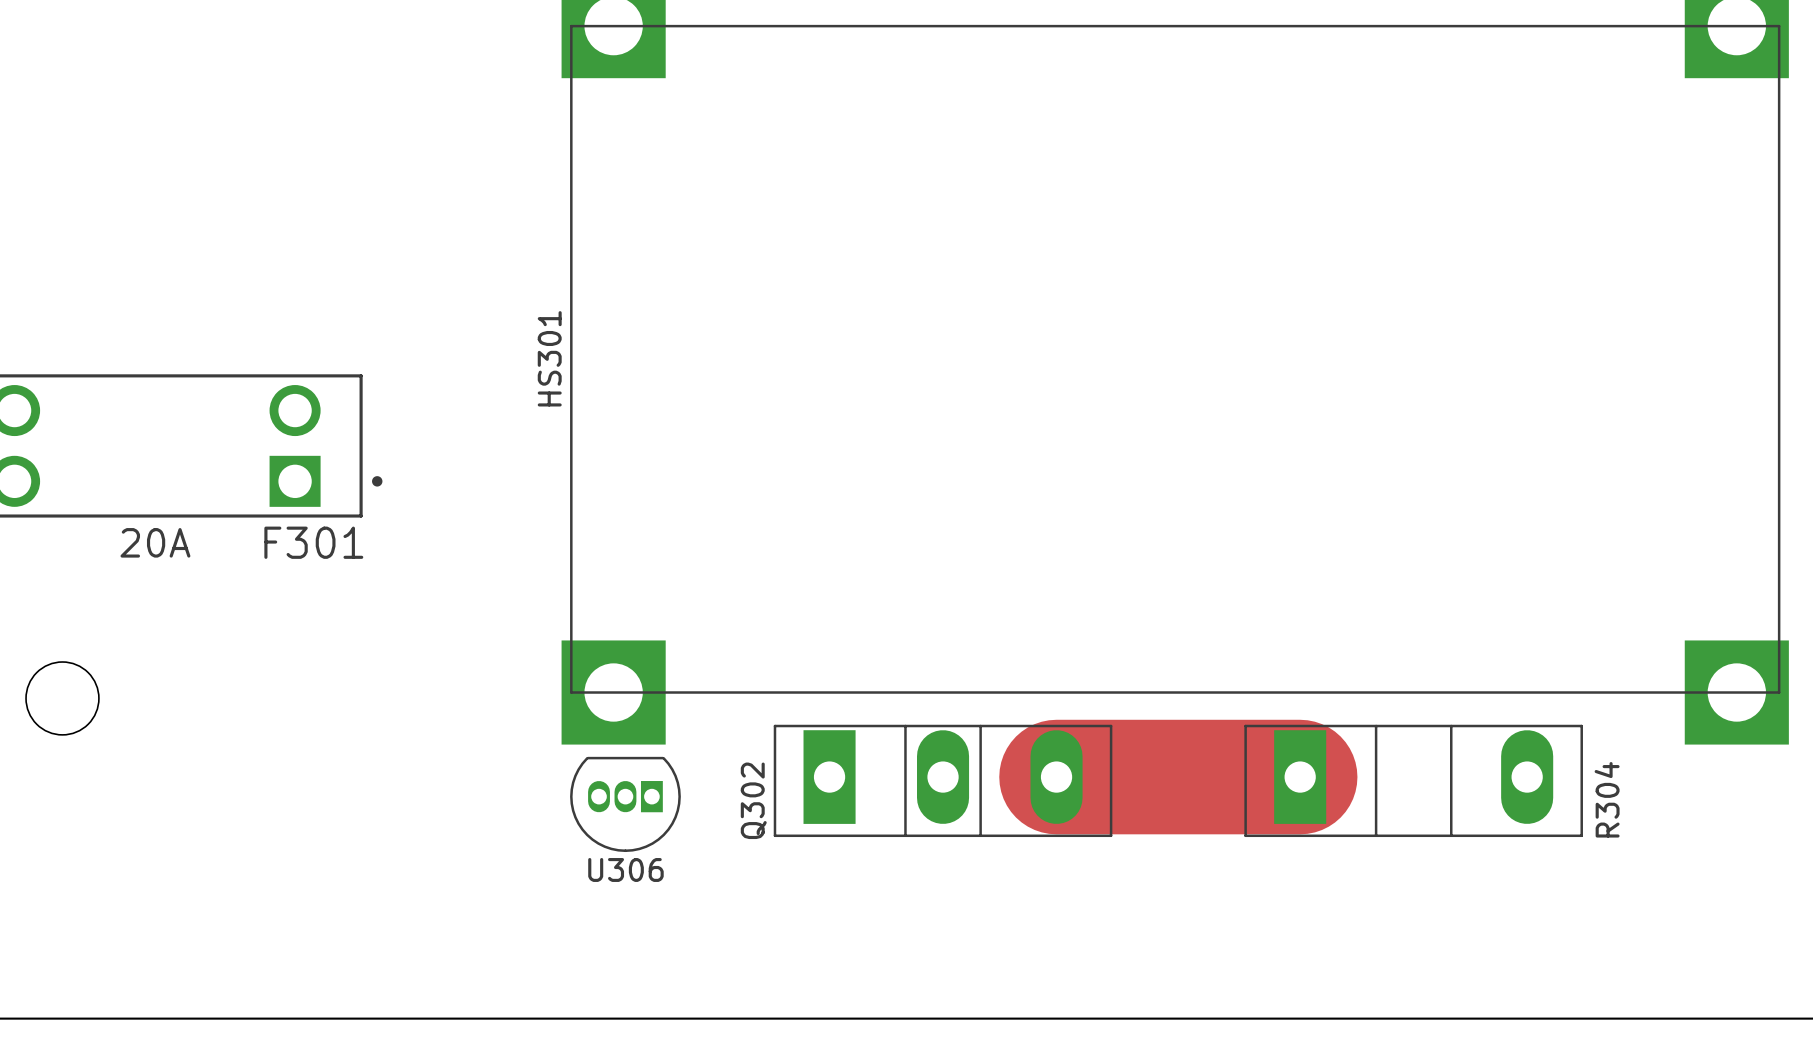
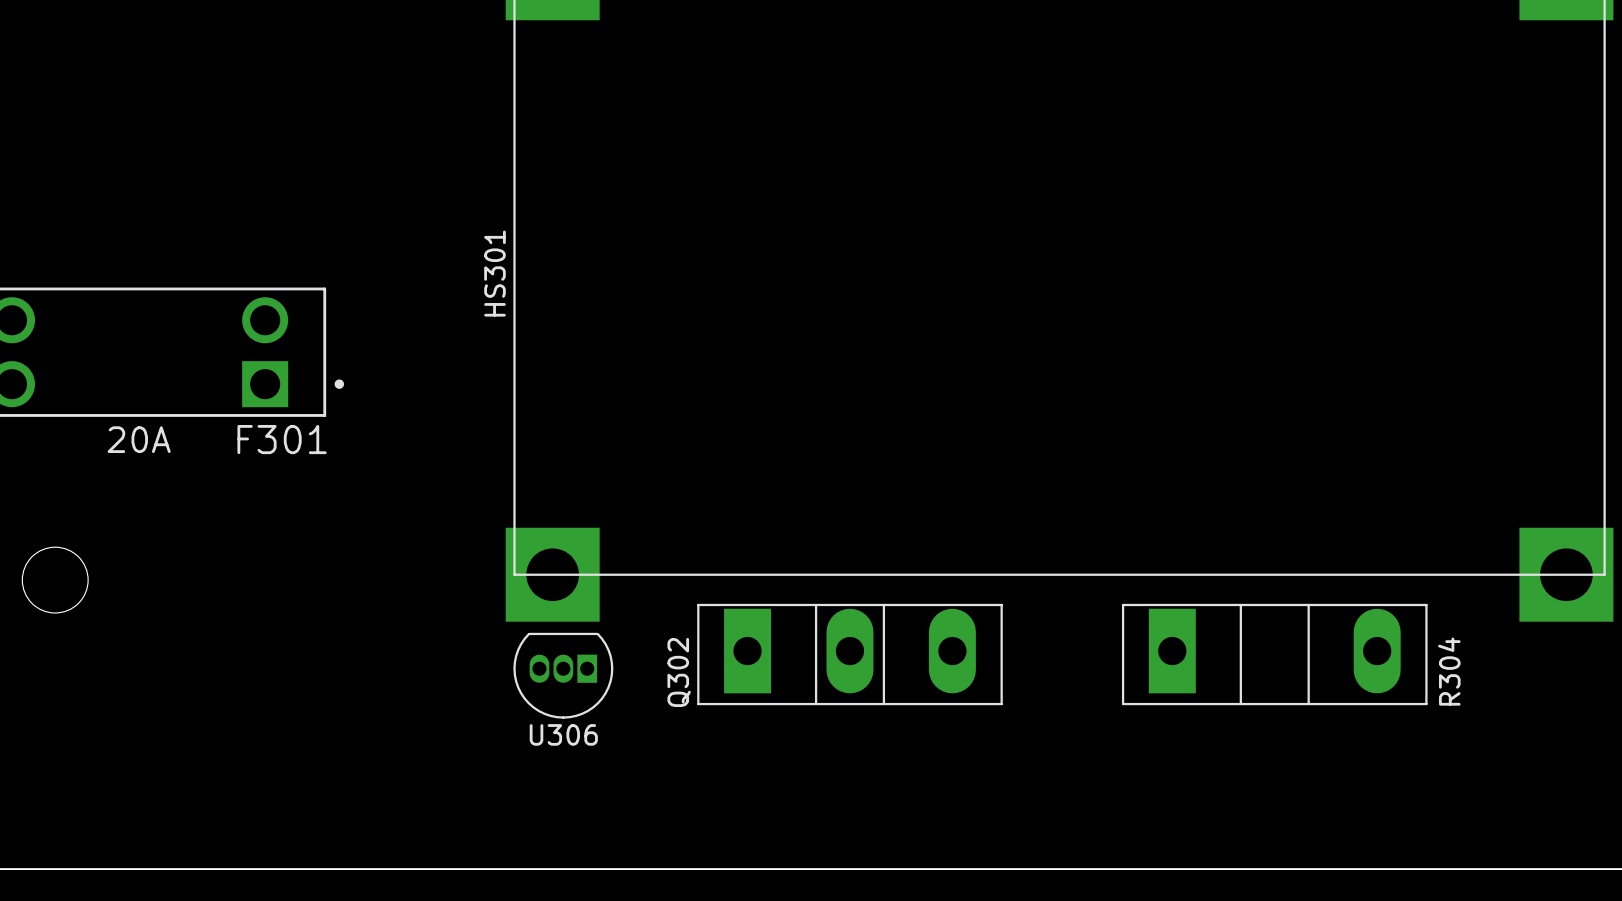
track: (1056, 777) (1300, 777) -> none

